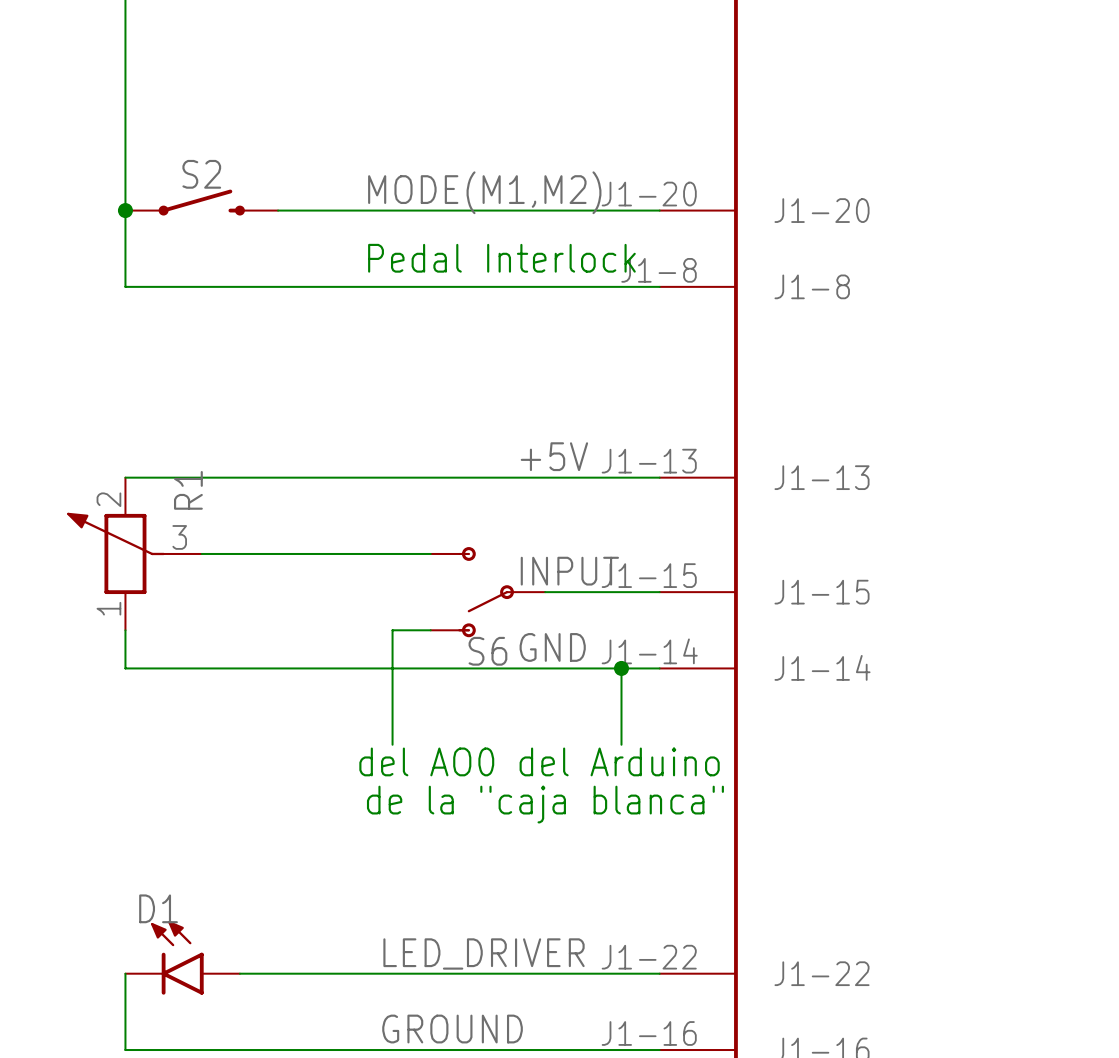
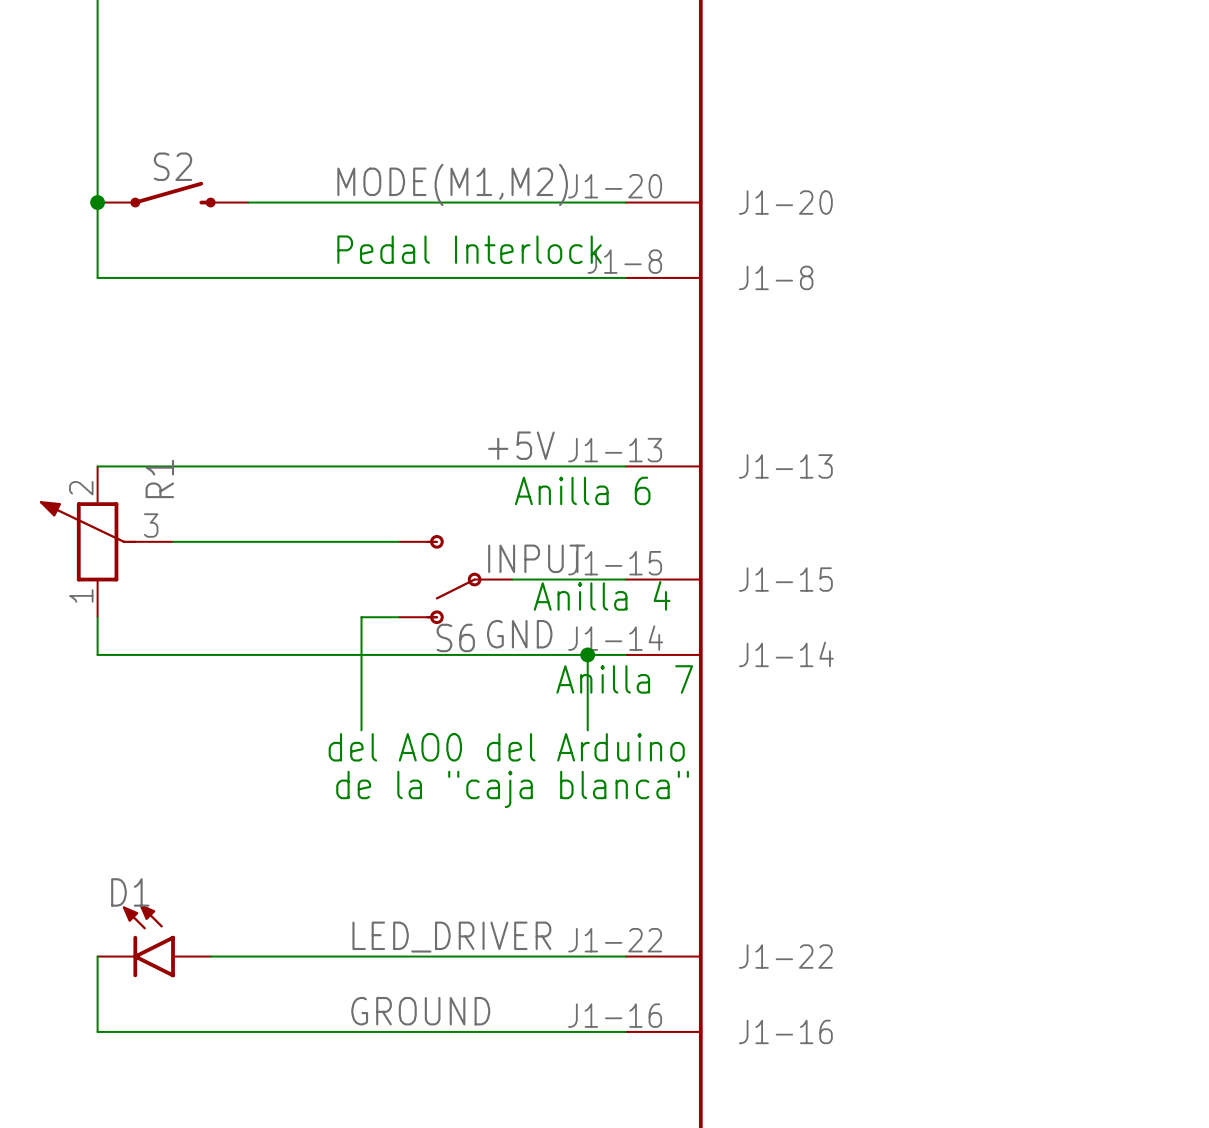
text: none -> Anilla 6 (582, 490)
text: none -> Anilla 4 (602, 595)
text: none -> Anilla 7 (624, 679)

